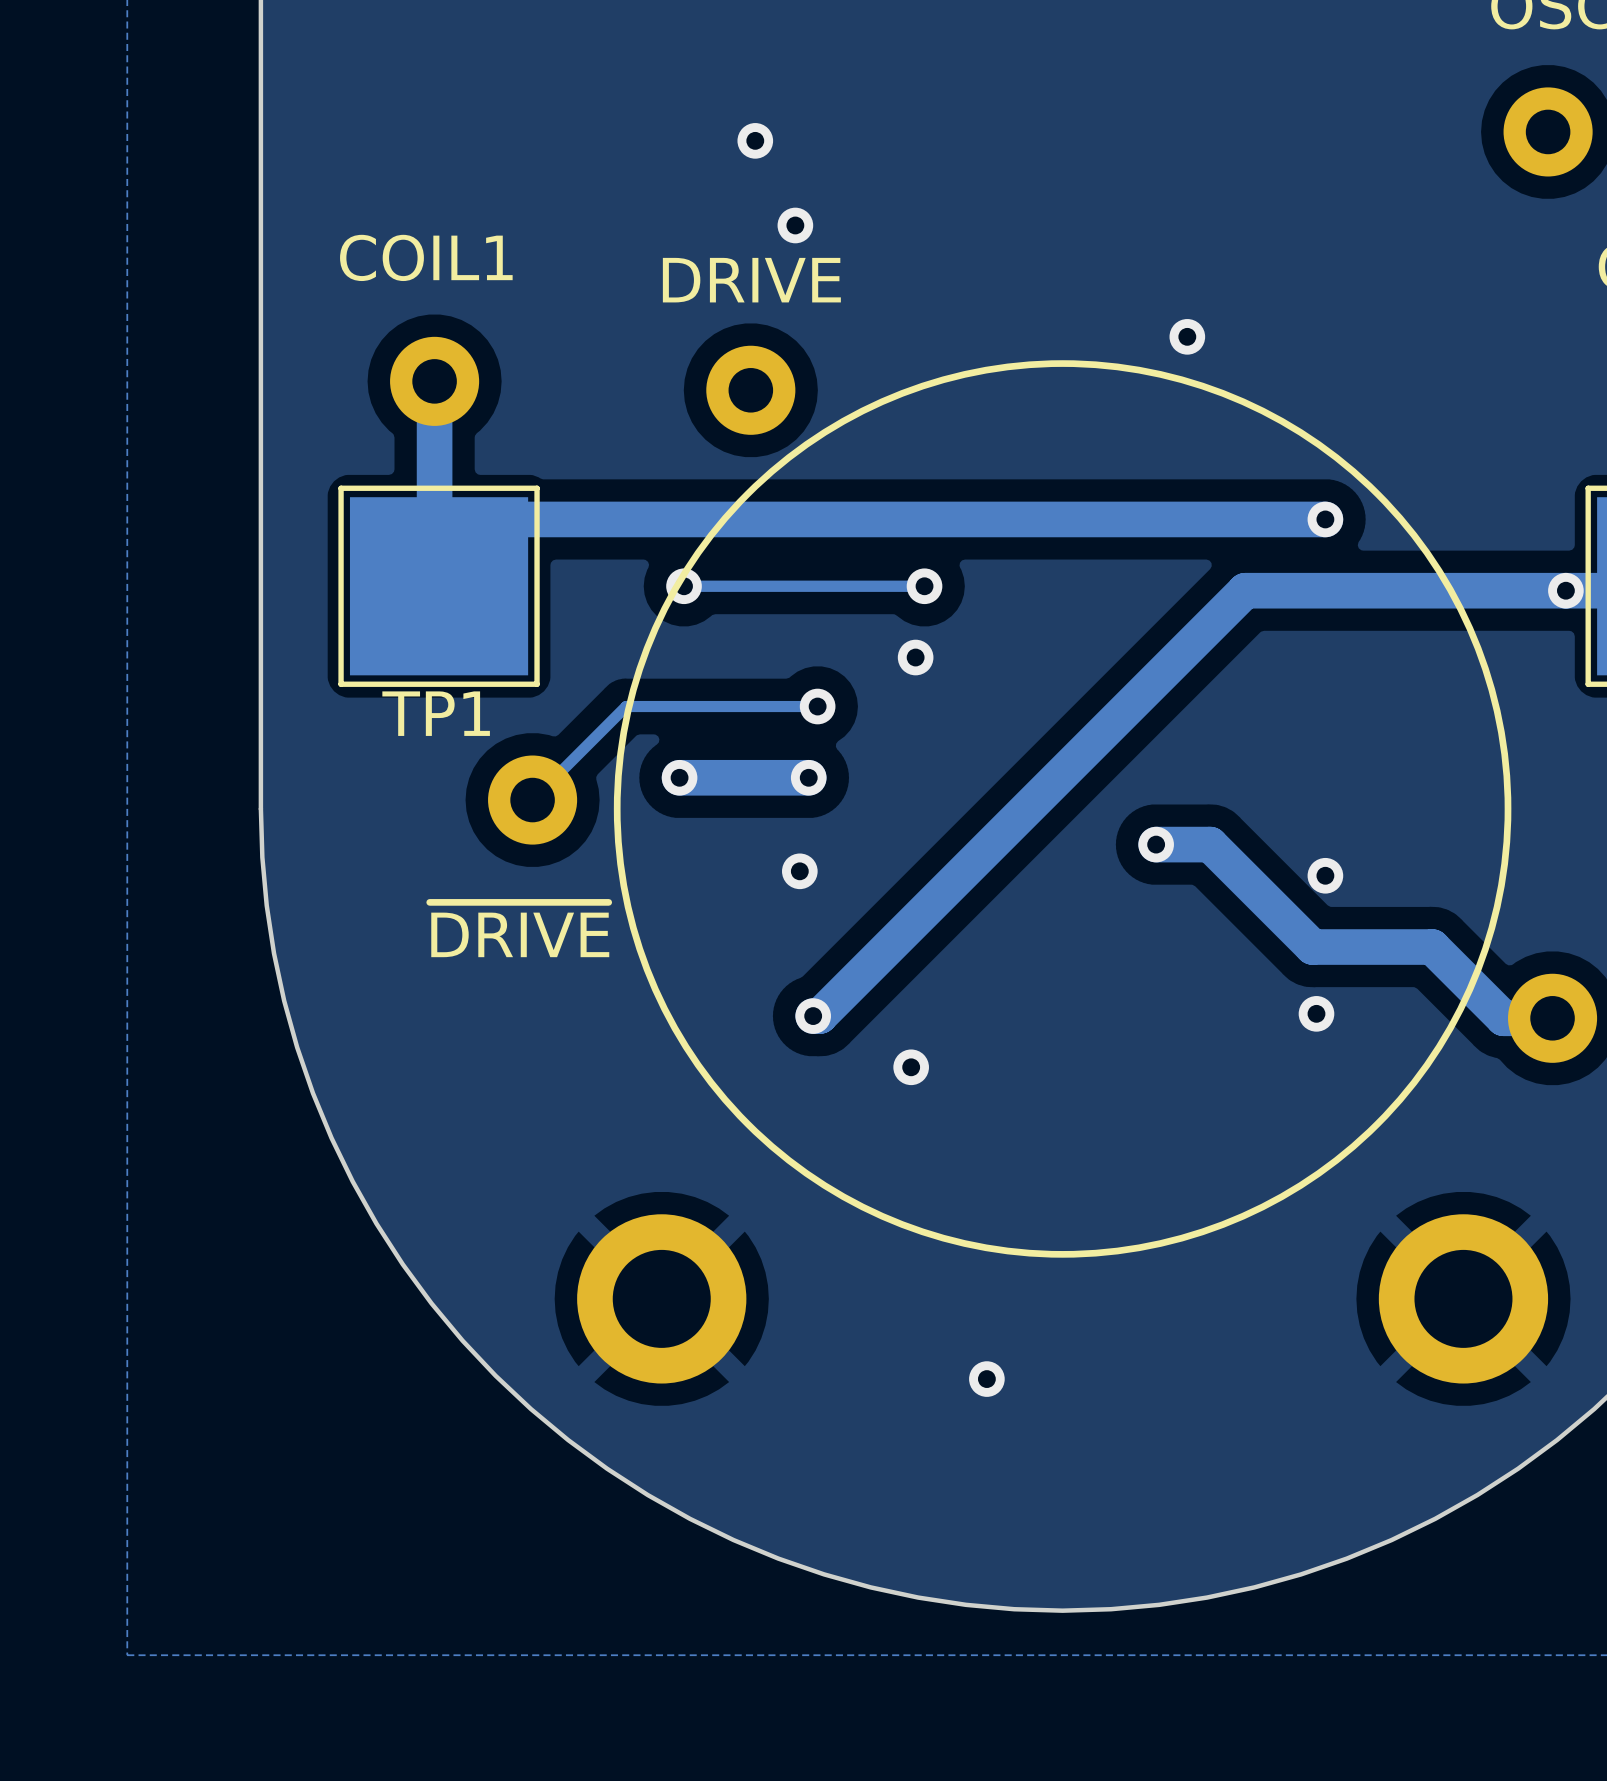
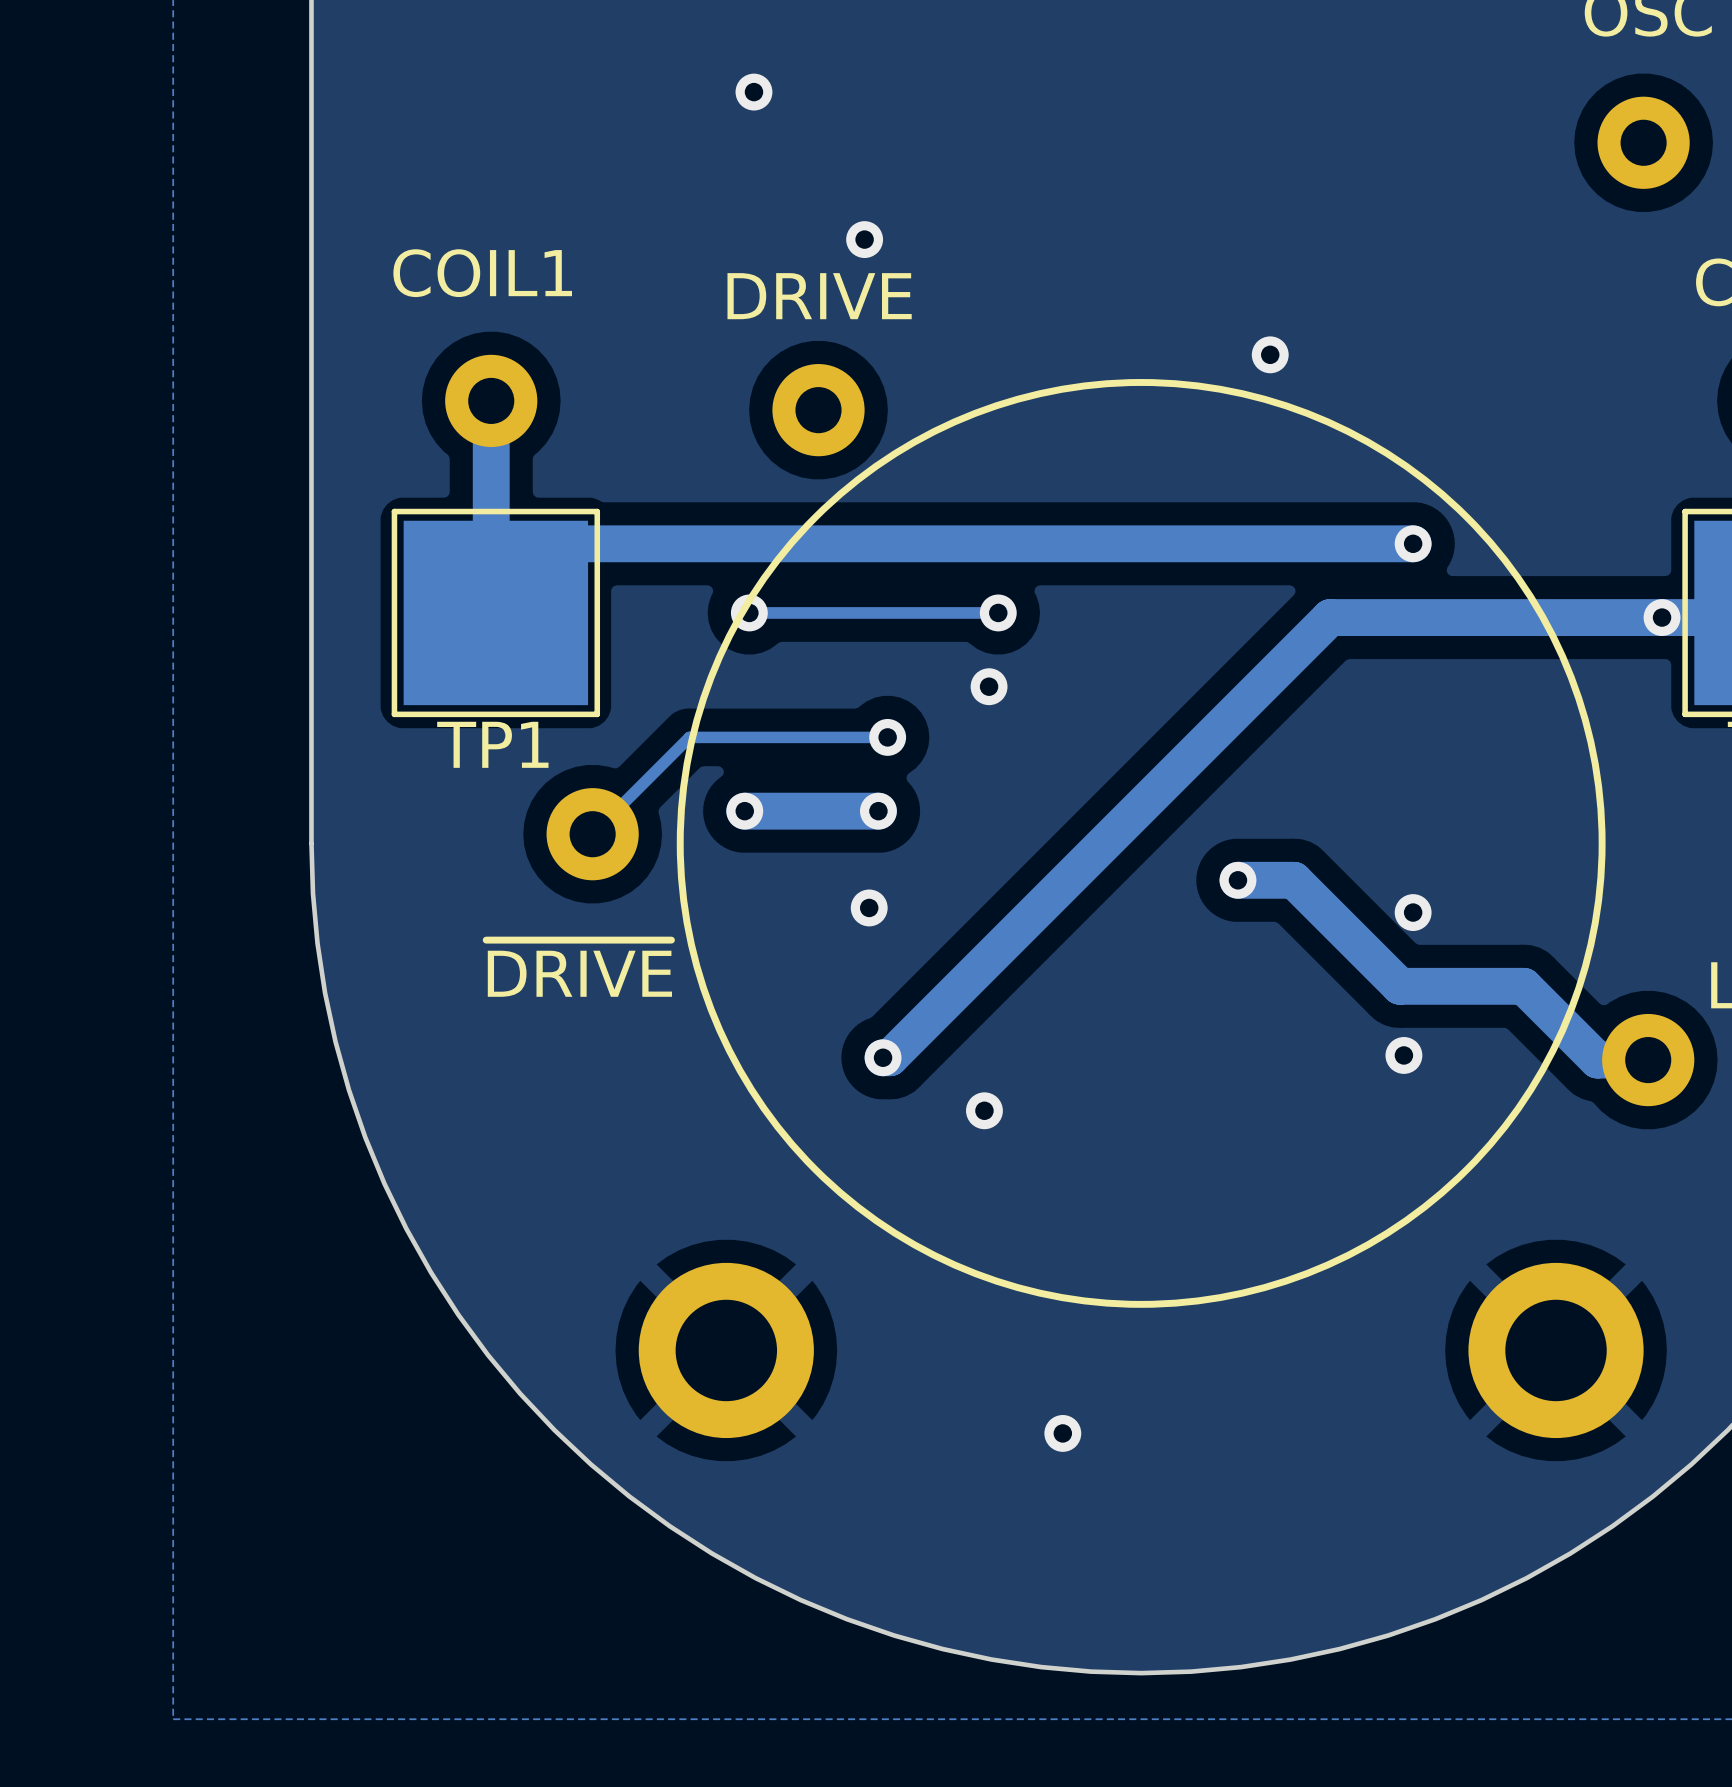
via position: (755, 140) -> (753, 92)

